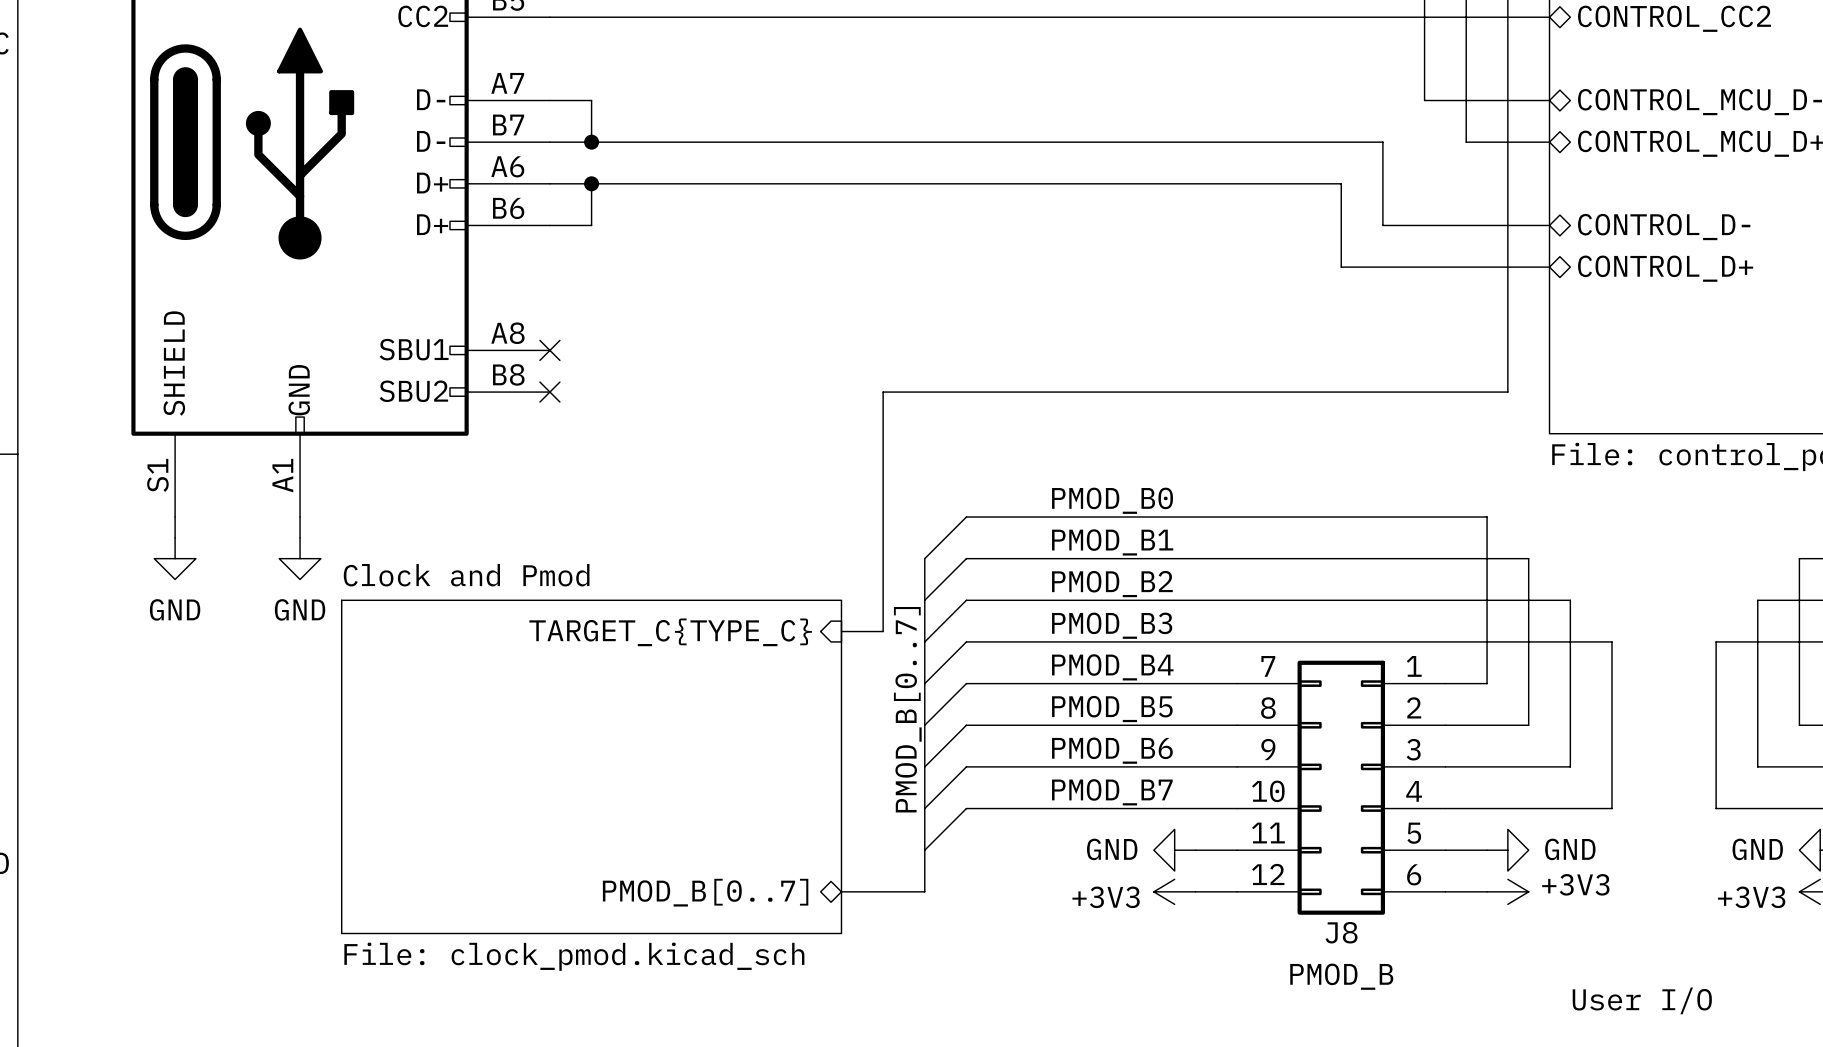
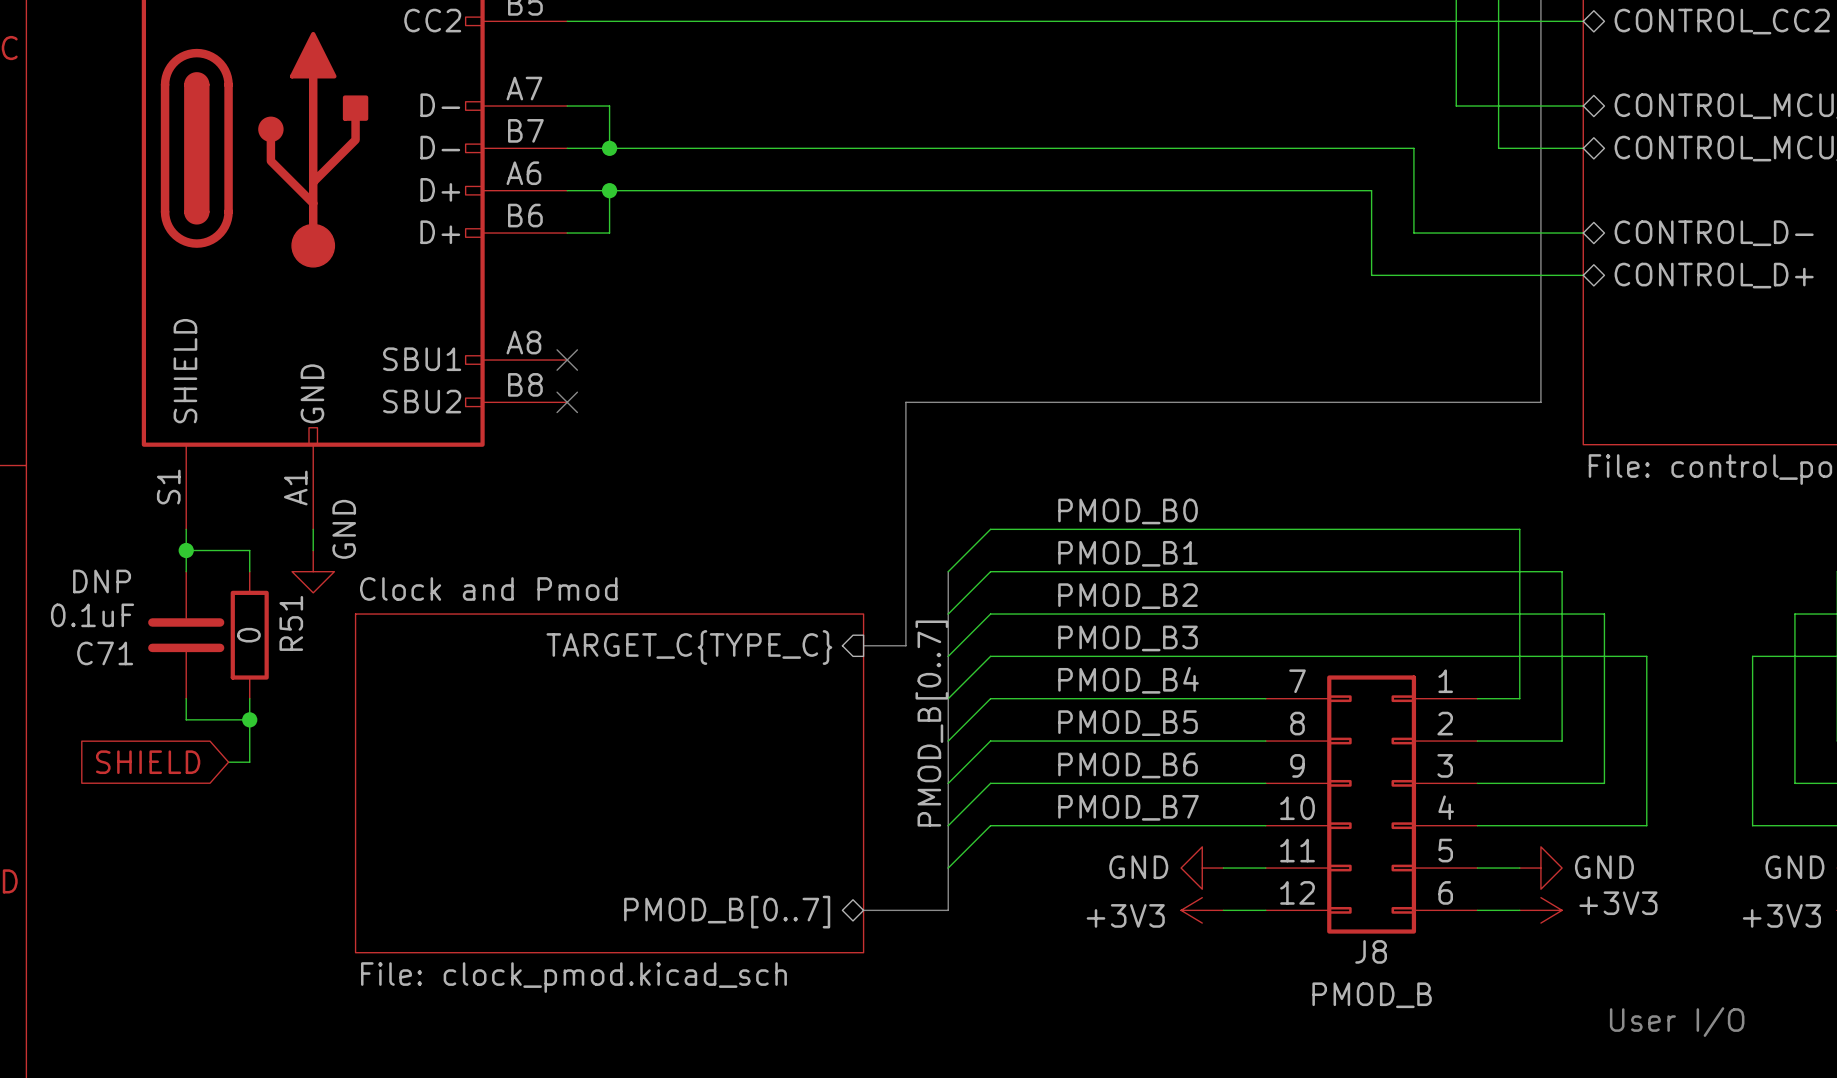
junction: none -> (186, 550)
wire: none -> (186, 571) (186, 550) (249, 550) (249, 571)
power symbol: GND (175, 558) -> none
power symbol text rotation: 0° (300, 609) -> 90° counterclockwise (344, 529)
power symbol text position: GND (300, 609) -> GND (344, 529)
C71: none -> 0.1uF (186, 635)
R51: none -> 0 (249, 635)
wire: none -> (186, 698) (186, 719) (249, 719)
wire: none -> (249, 698) (249, 762) (228, 762)
junction: none -> (249, 719)
global label: none -> SHIELD (148, 762)

